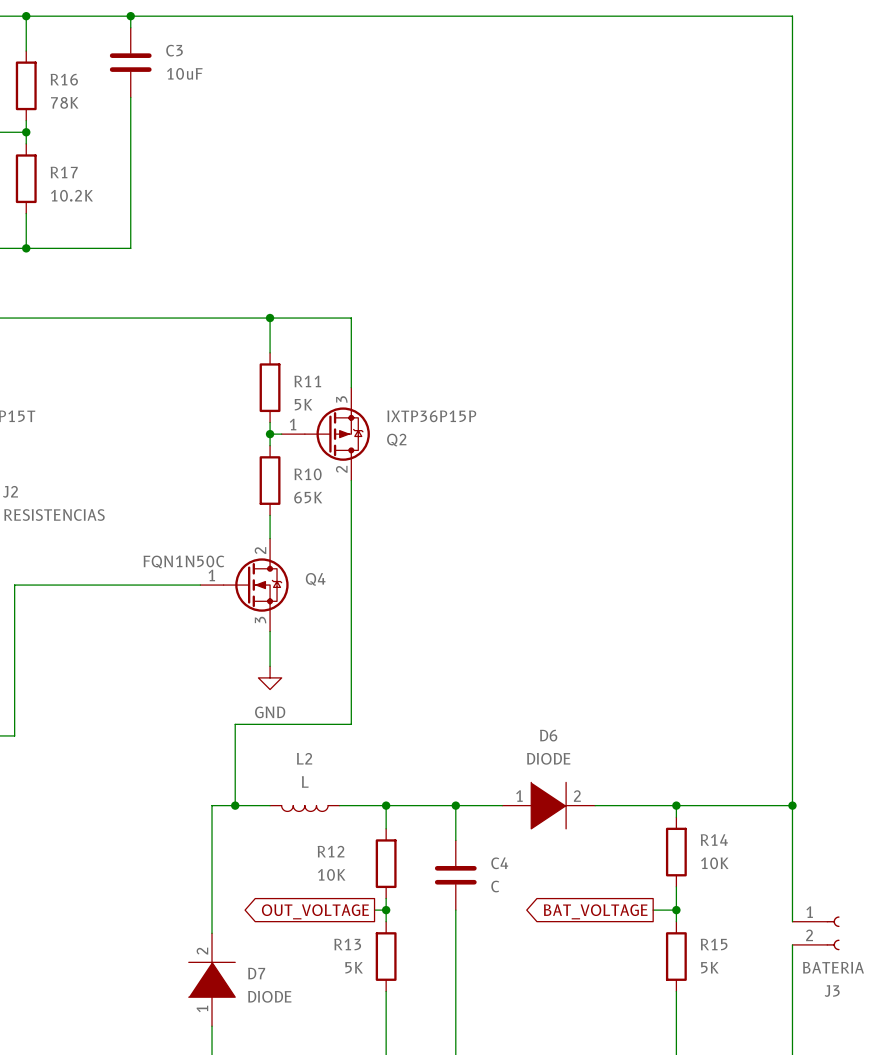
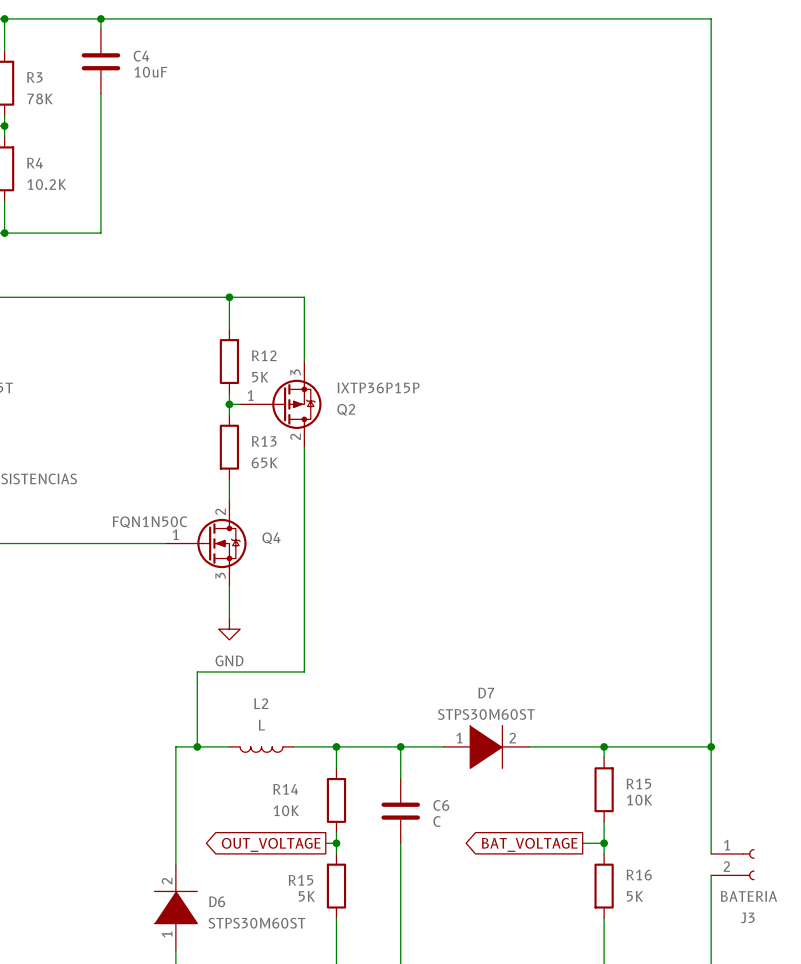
C3 name: C3 (174, 50) -> C4 (141, 56)
R16 name: R16 (64, 79) -> R3 (34, 77)
R17 name: R17 (64, 172) -> R4 (35, 163)
R11 name: R11 (307, 381) -> R12 (264, 355)
R10 name: R10 (308, 474) -> R13 (264, 441)
D6 name: D6 (548, 735) -> D7 (486, 693)
D6 value: DIODE (548, 758) -> STPS30M60ST (486, 714)
R14 name: R14 (714, 840) -> R15 (638, 783)
R12 name: R12 (331, 851) -> R14 (285, 789)
C4 name: C4 (499, 863) -> C6 (441, 805)
R13 name: R13 (347, 944) -> R15 (300, 880)
R15 name: R15 (714, 944) -> R16 (639, 875)
D7 name: D7 (256, 973) -> D6 (217, 901)
D7 value: DIODE (269, 996) -> STPS30M60ST (256, 923)

